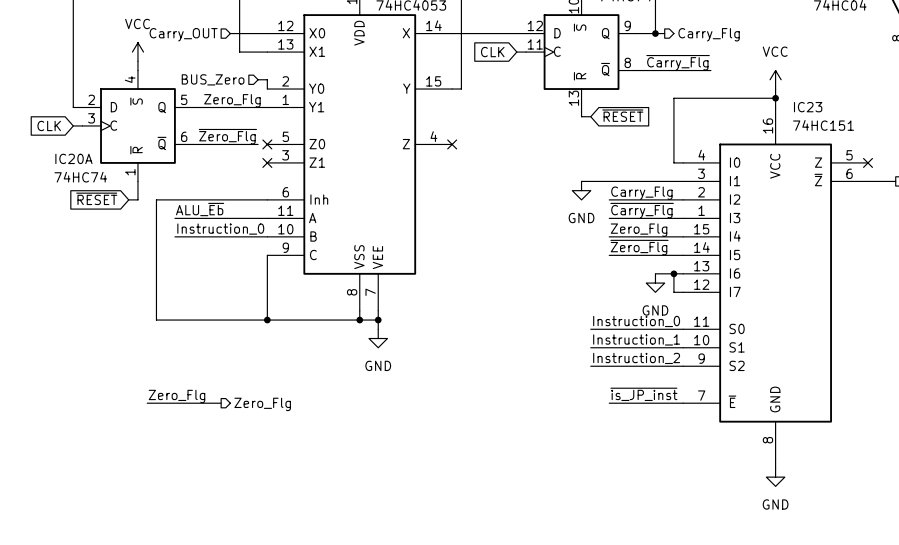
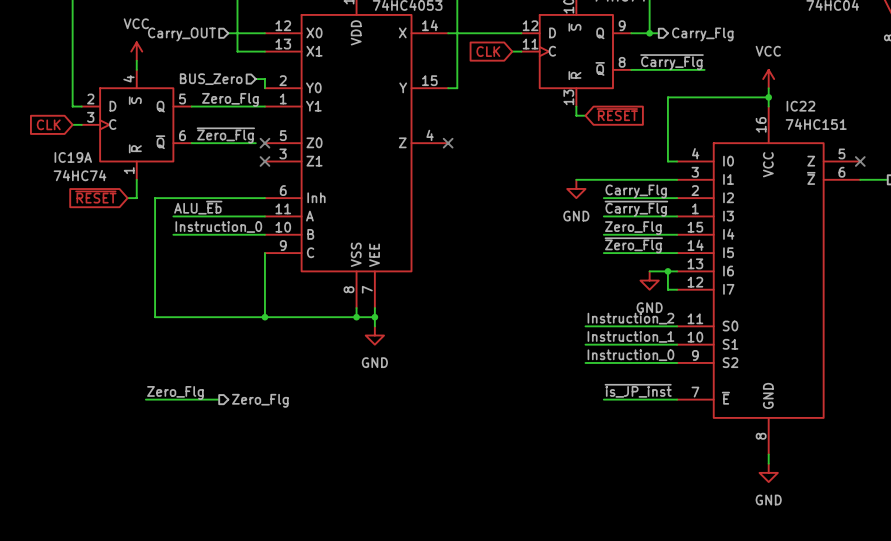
IC23 name: IC23 (808, 107) -> IC22 (800, 106)
IC20A name: IC20A (73, 158) -> IC19A (73, 157)
label: Instruction_0 (636, 321) -> Instruction_2 (630, 318)
label: Instruction_2 (636, 358) -> Instruction_0 (630, 355)

